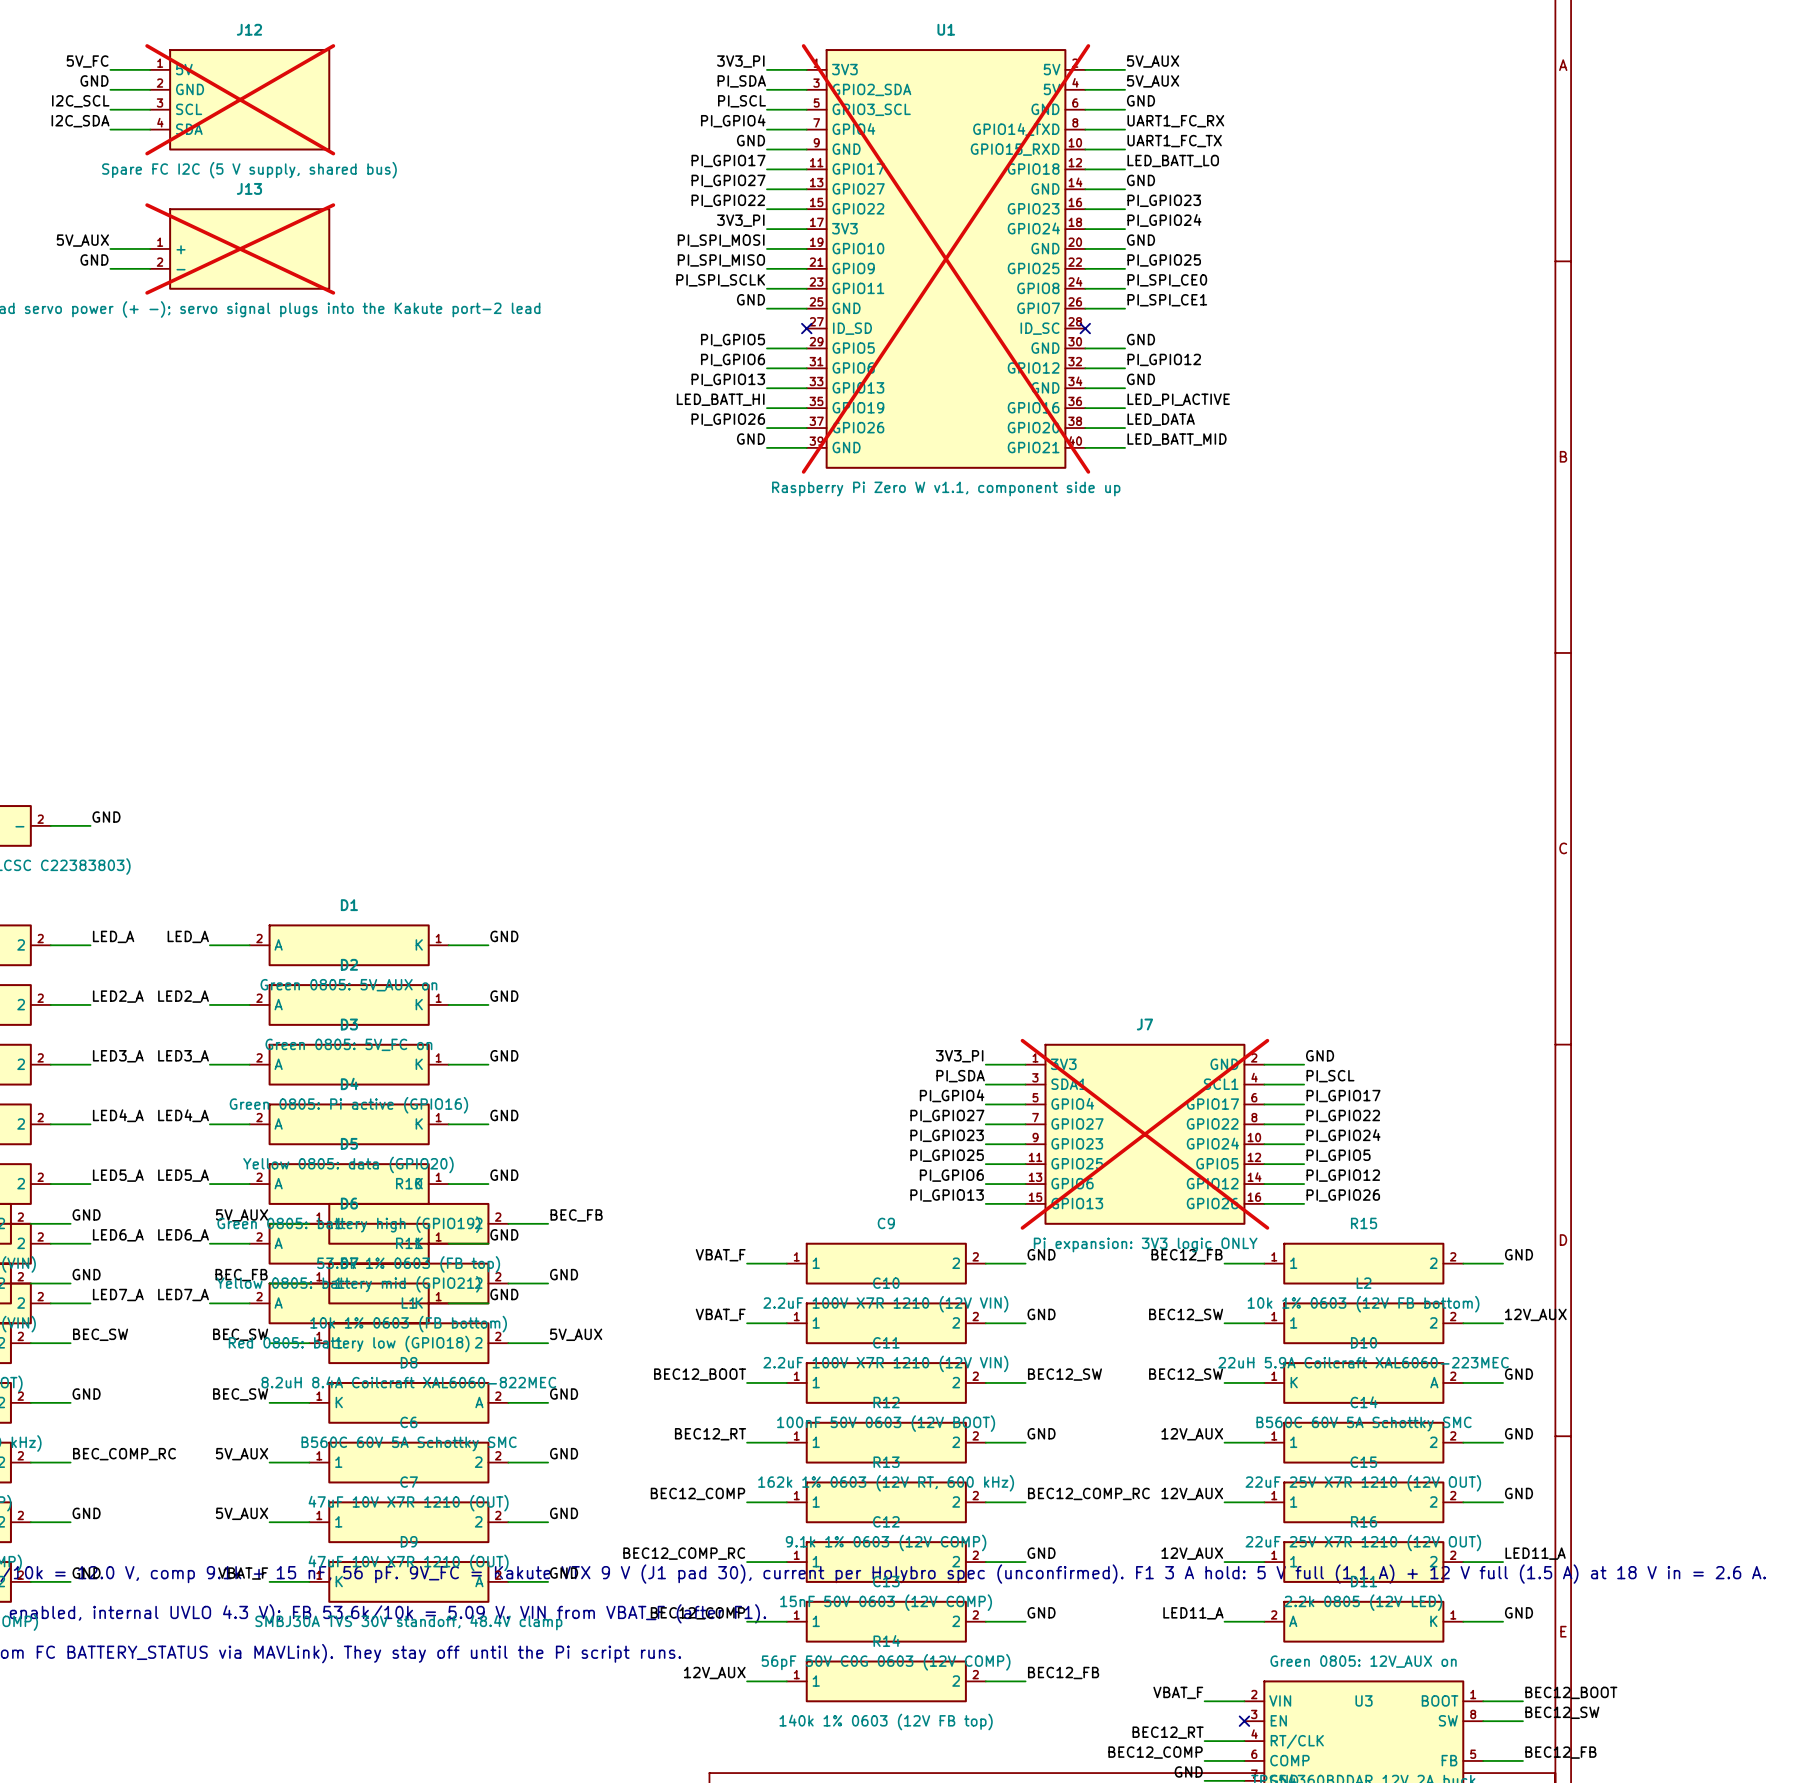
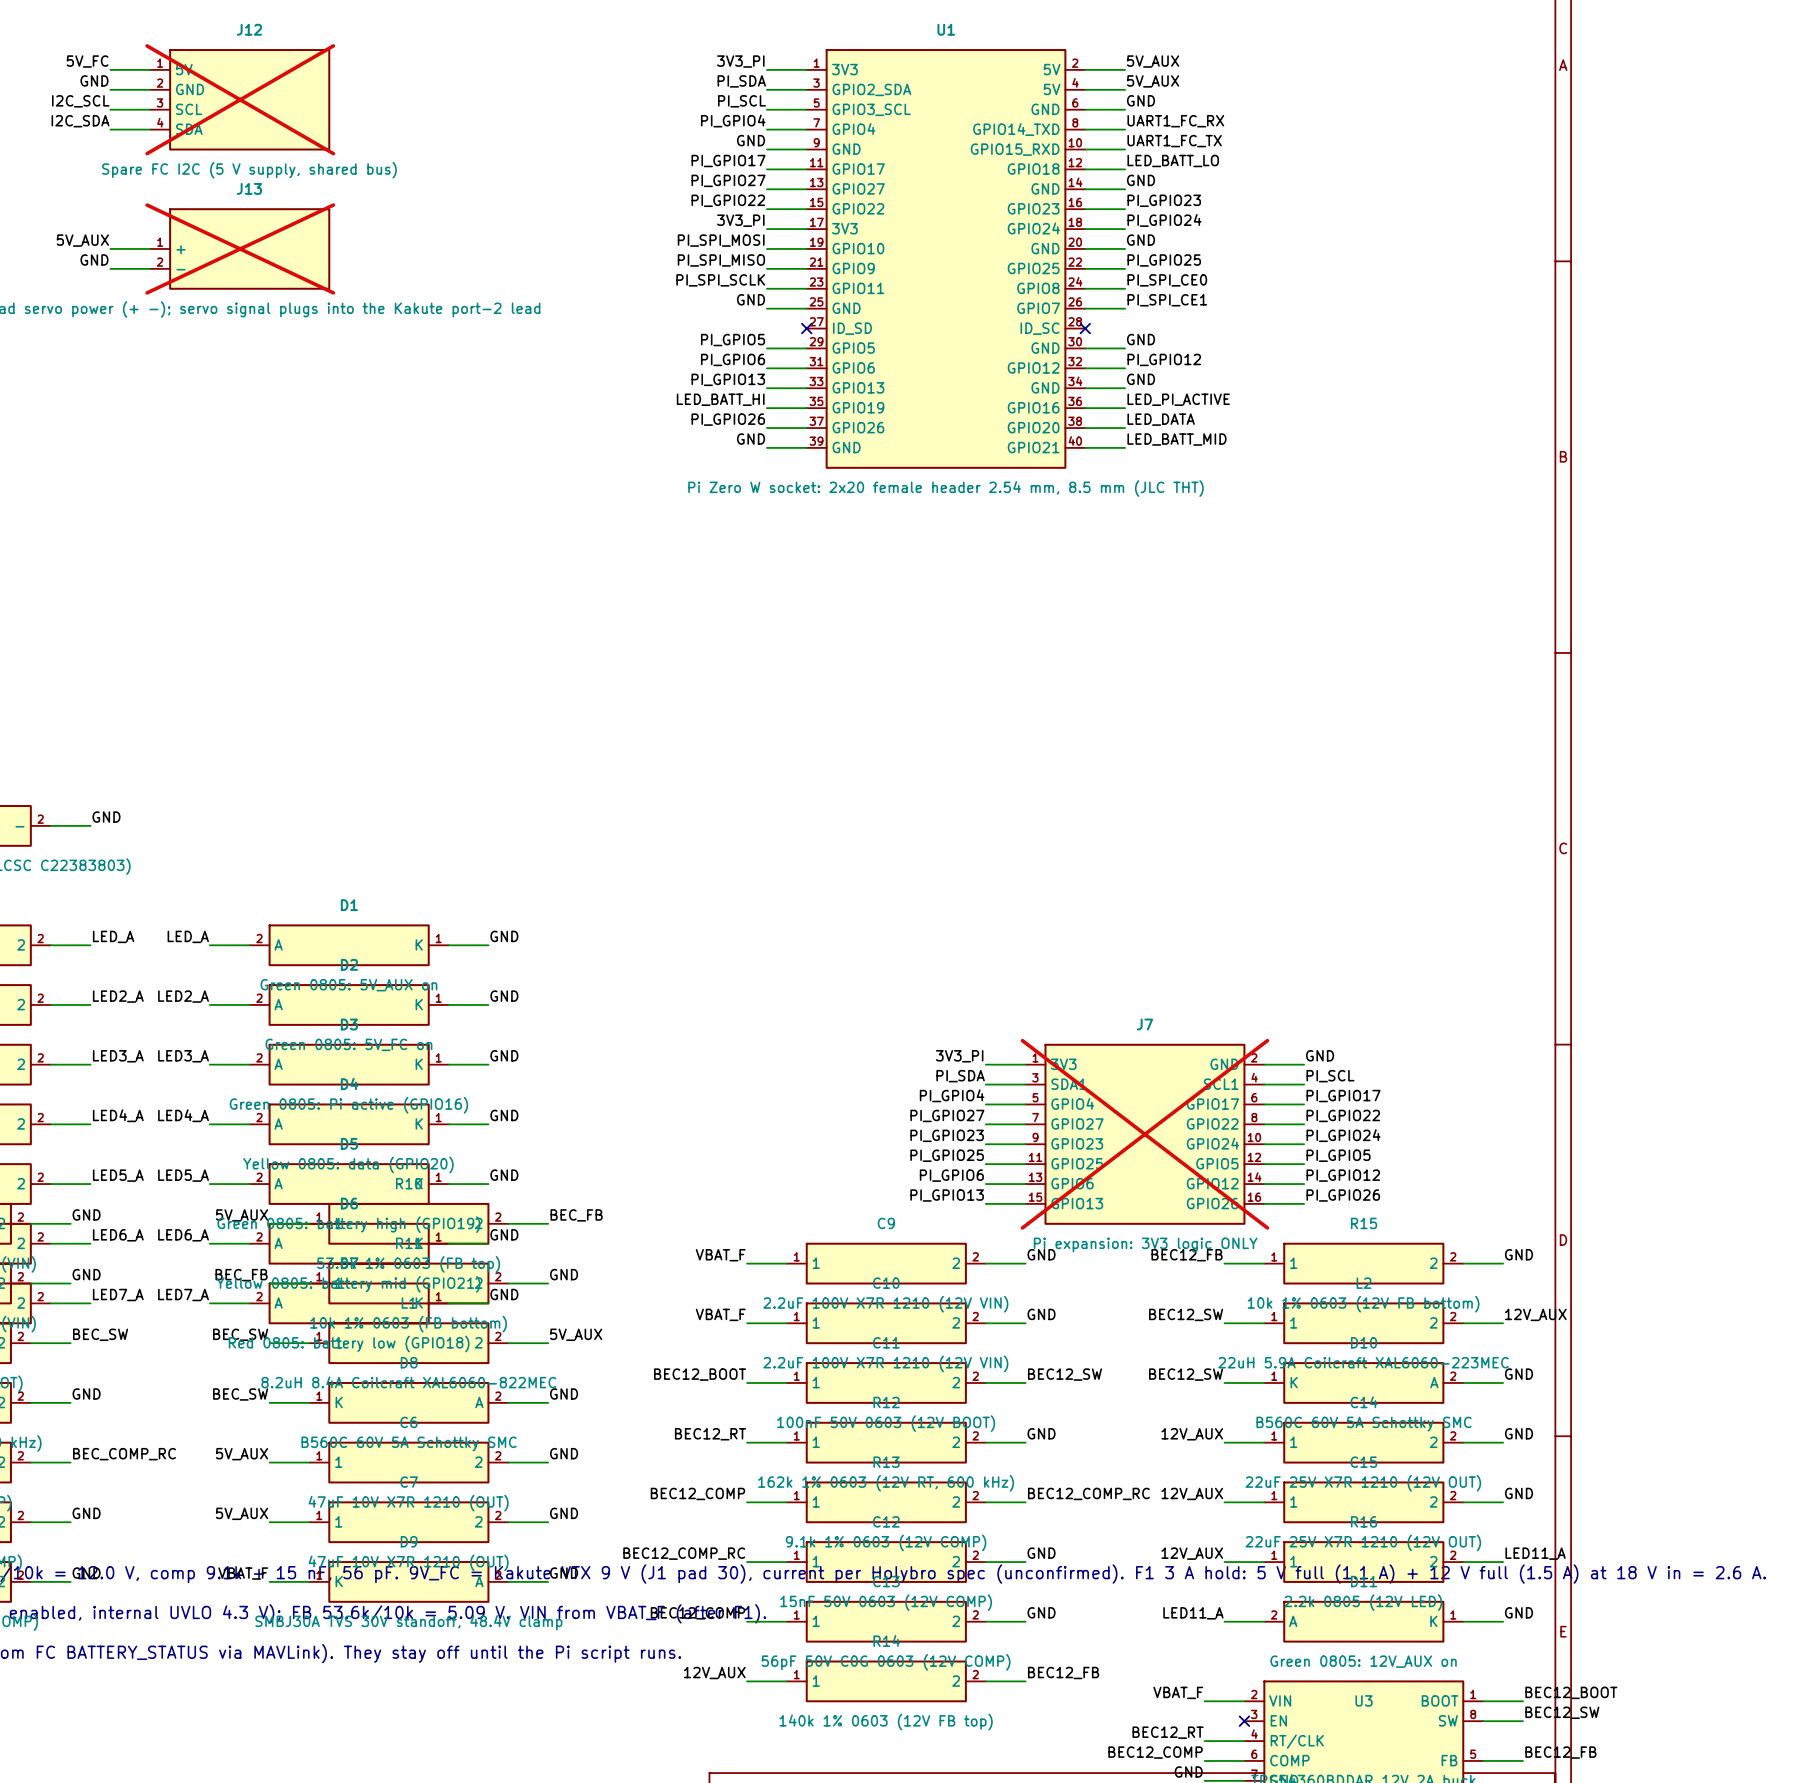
U1 do-not-place cross: (946, 258) -> none
U1 value: Raspberry Pi Zero W v1.1, component side up (946, 489) -> Pi Zero W socket: 2x20 female header 2.54 mm, 8.5 mm (JLC THT) (946, 488)

